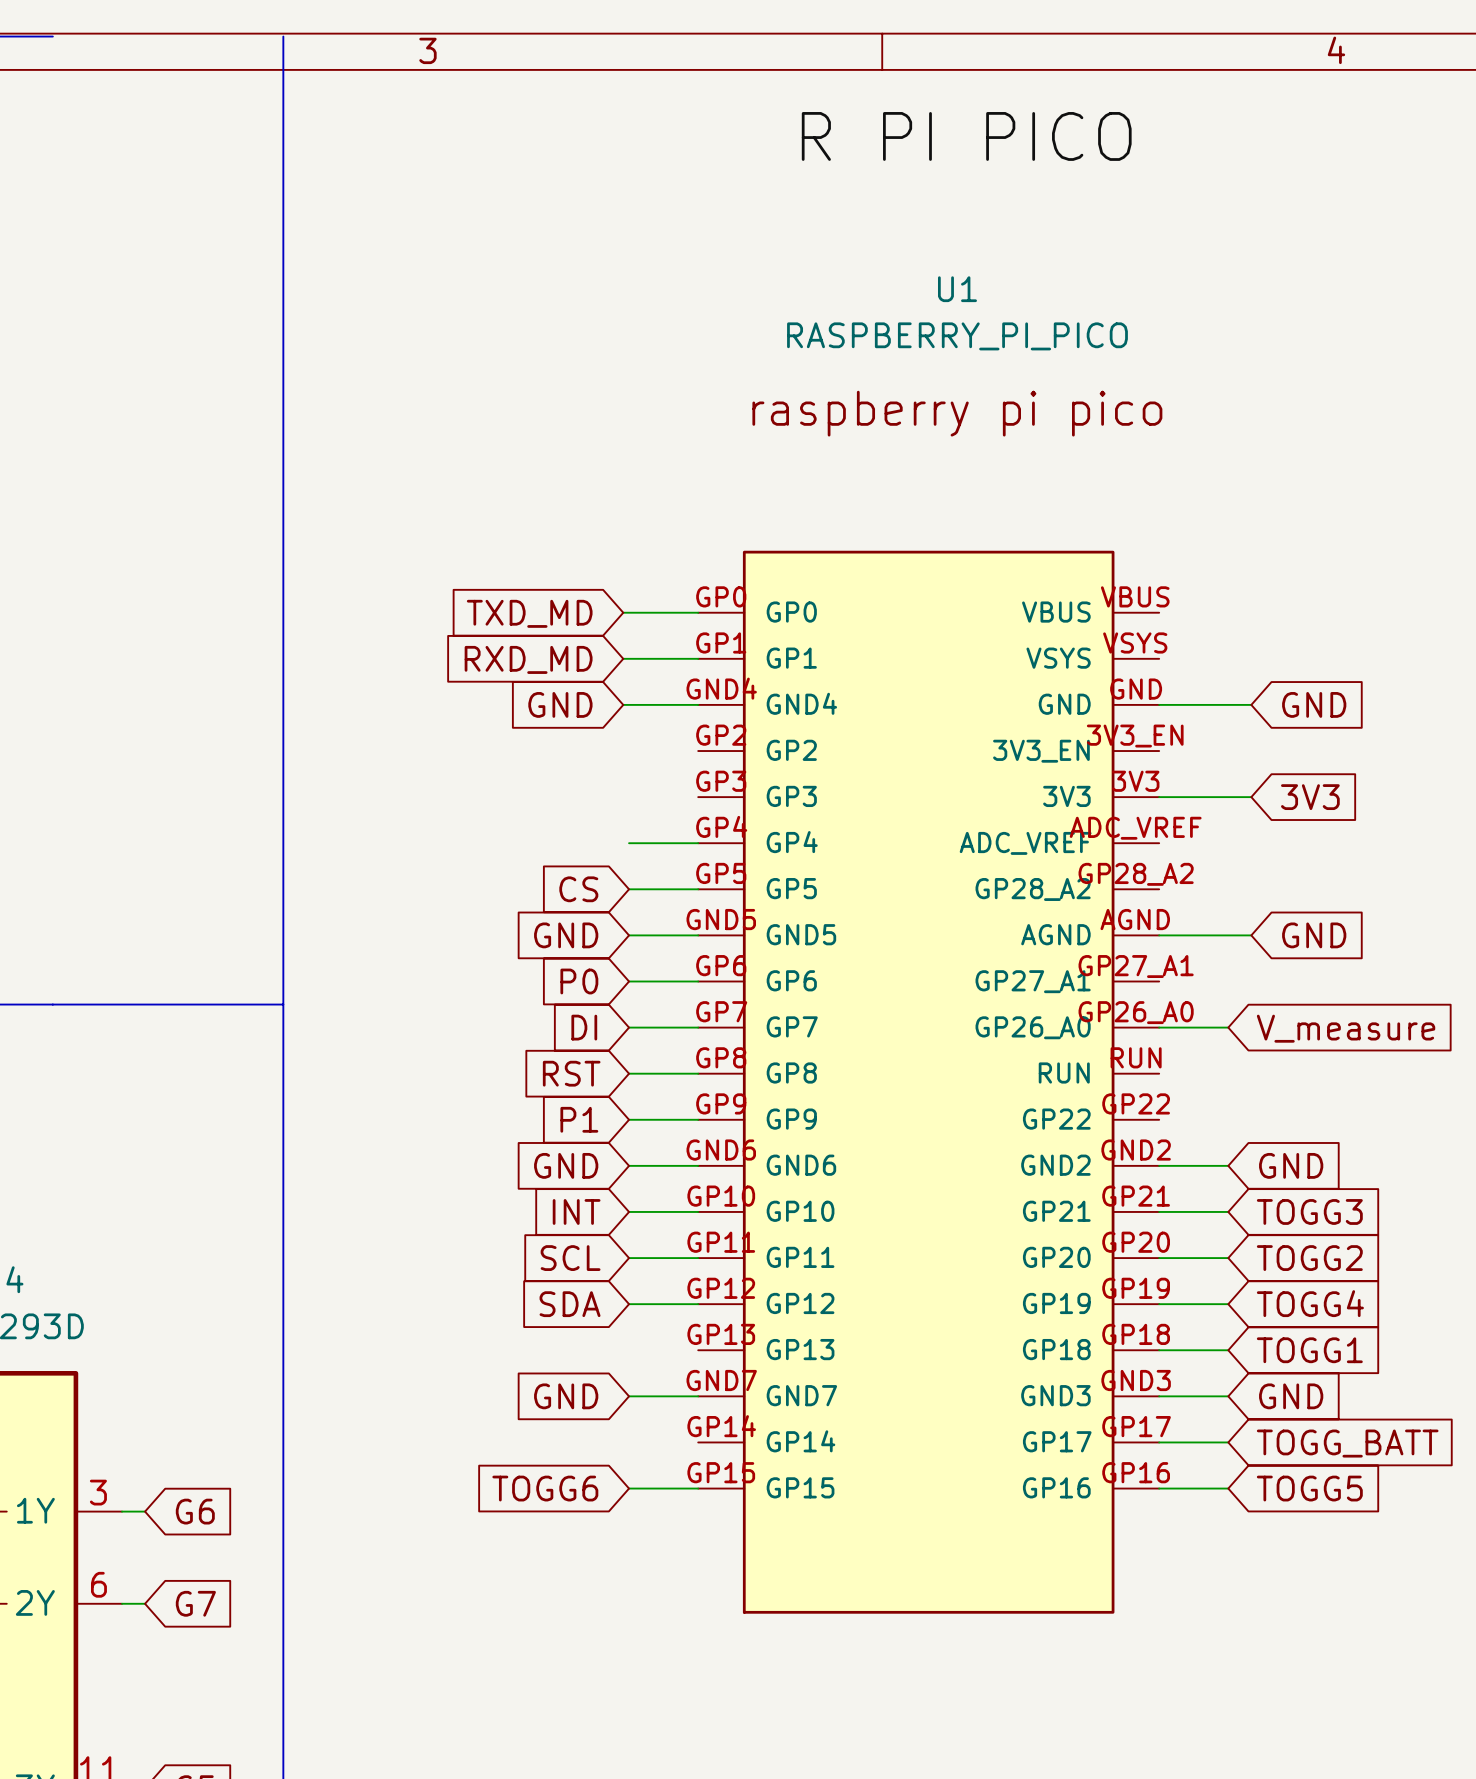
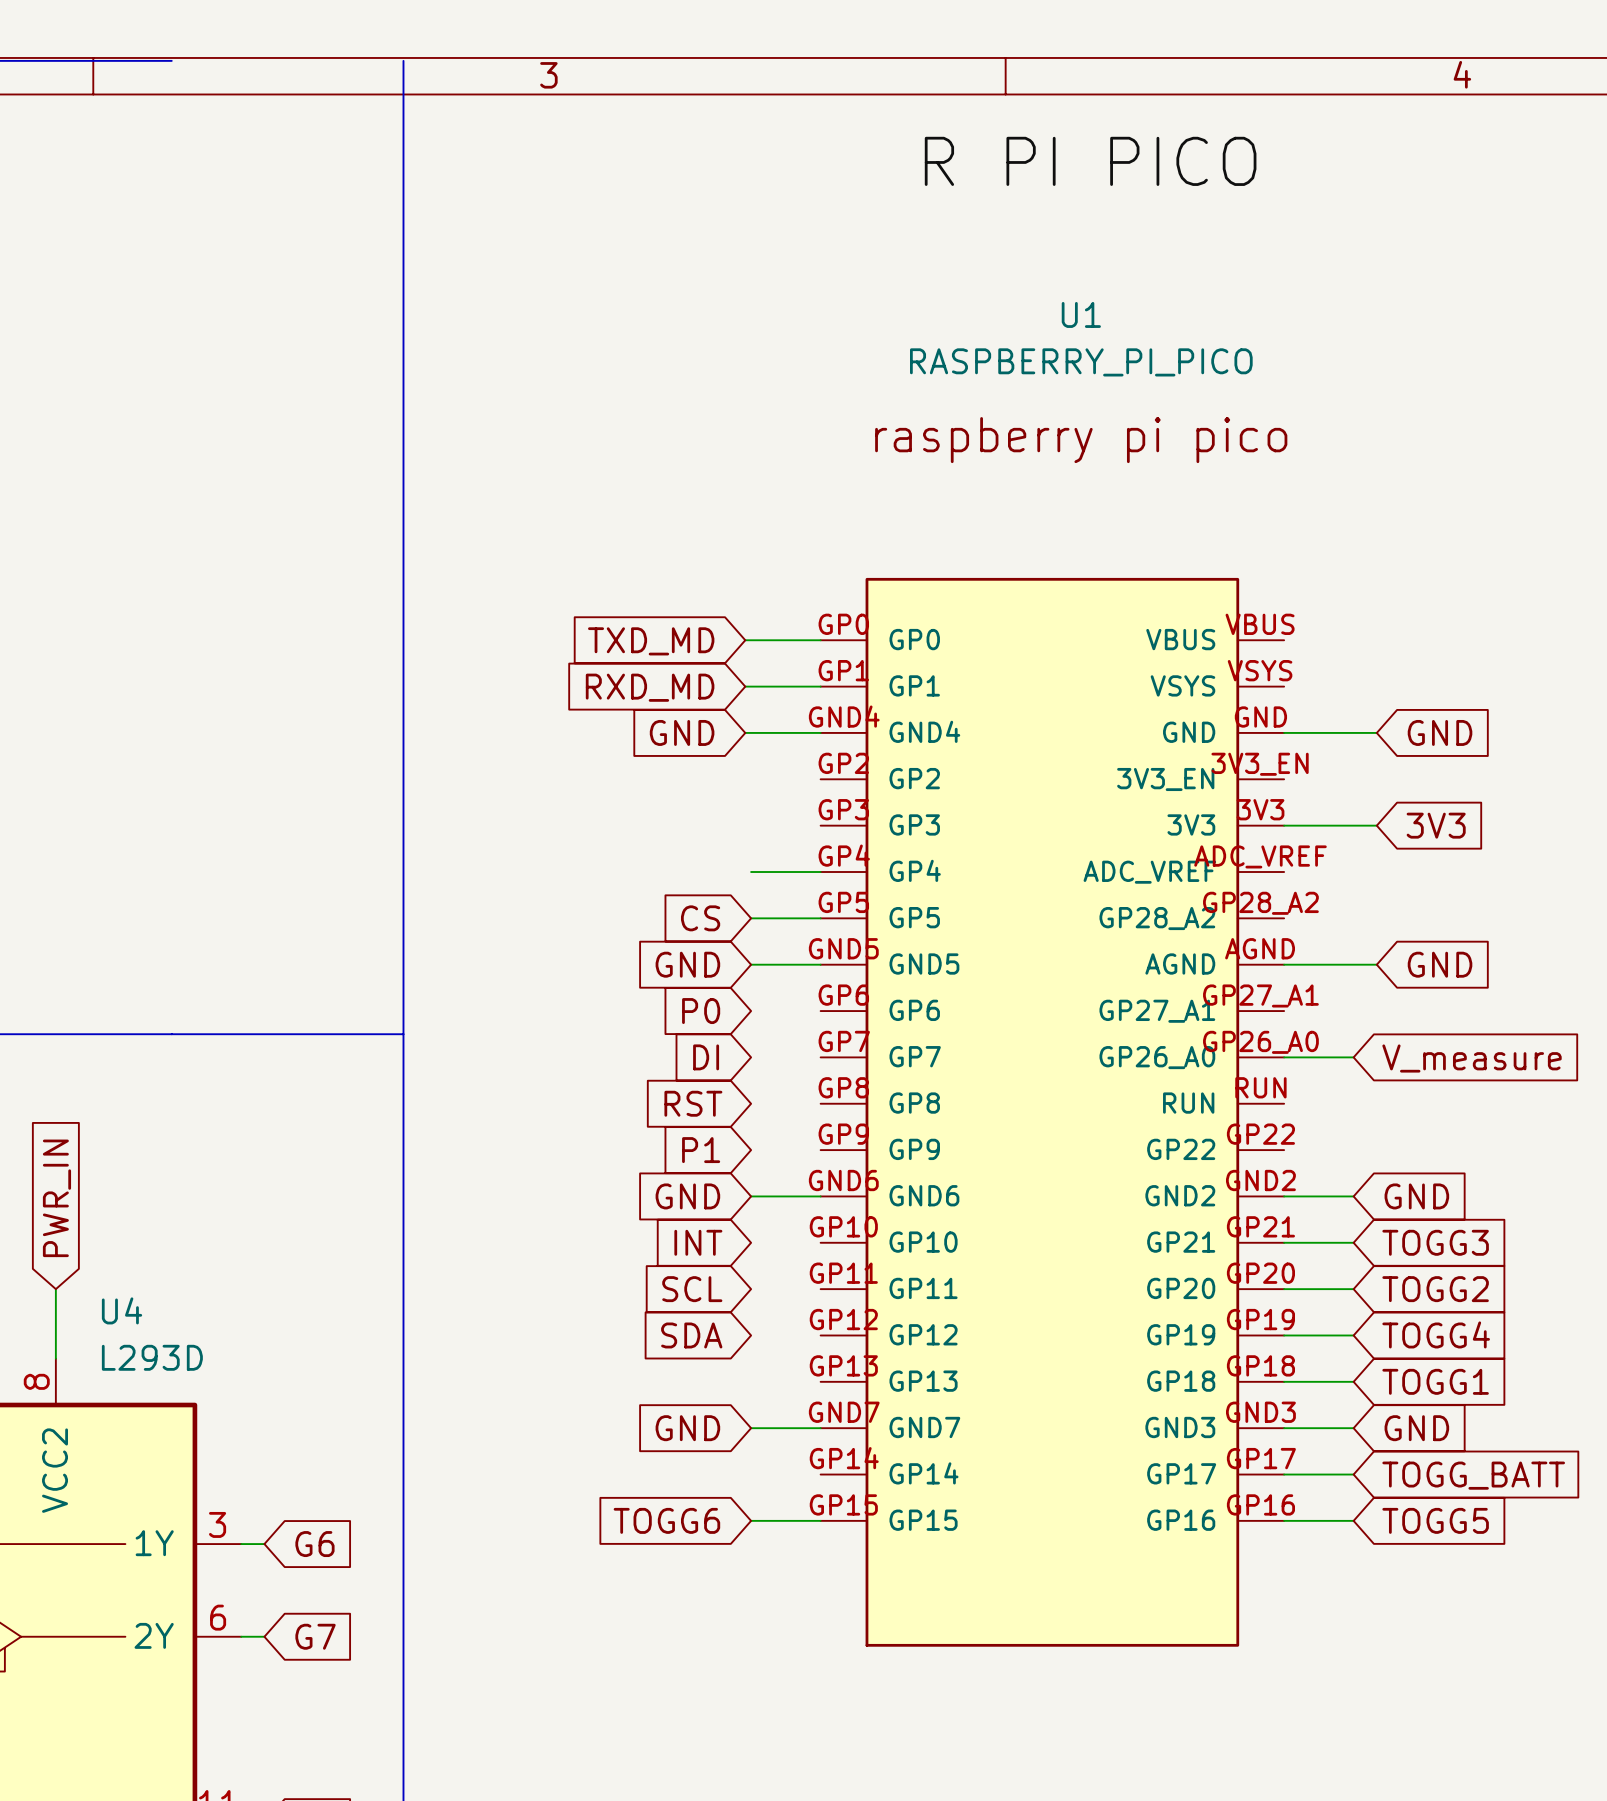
wire: (629, 981) (698, 981) -> none
wire: (629, 1027) (698, 1027) -> none
wire: (629, 1073) (698, 1073) -> none
wire: (629, 1119) (698, 1119) -> none
wire: (629, 1211) (698, 1211) -> none
wire: (629, 1258) (698, 1258) -> none
wire: (629, 1304) (698, 1304) -> none

